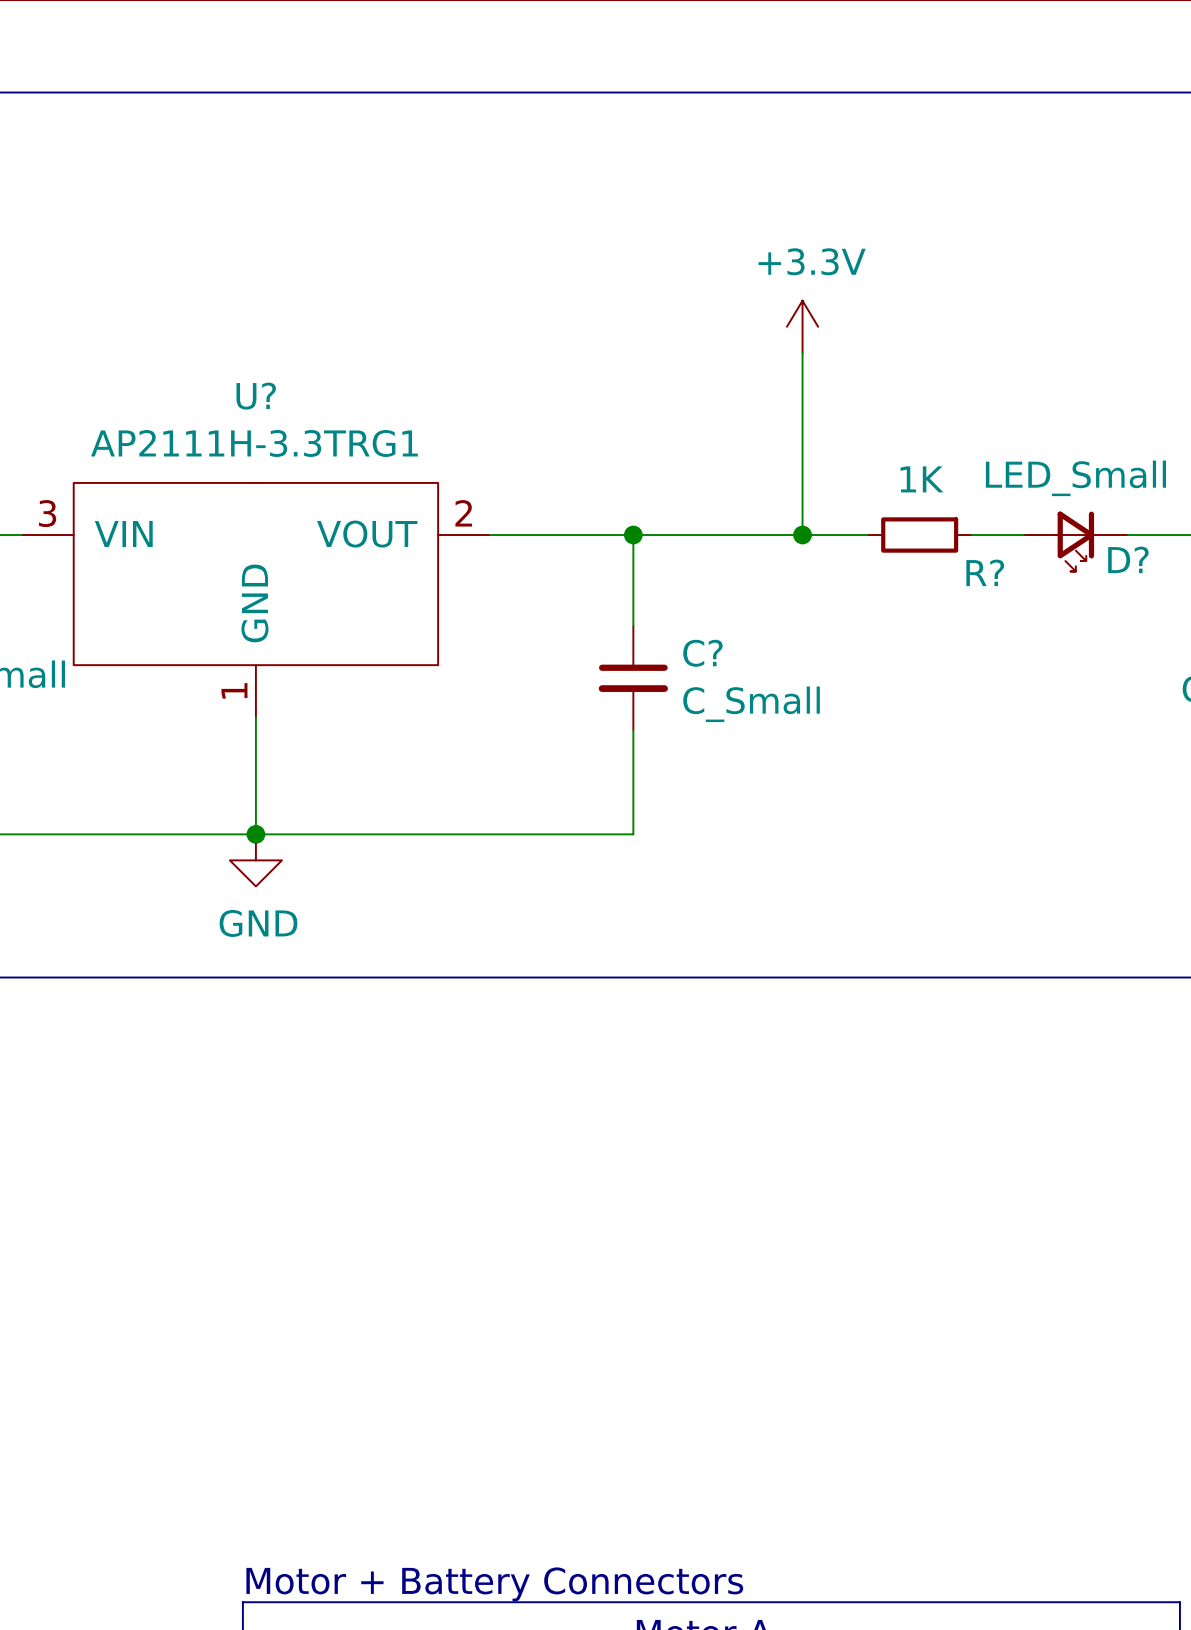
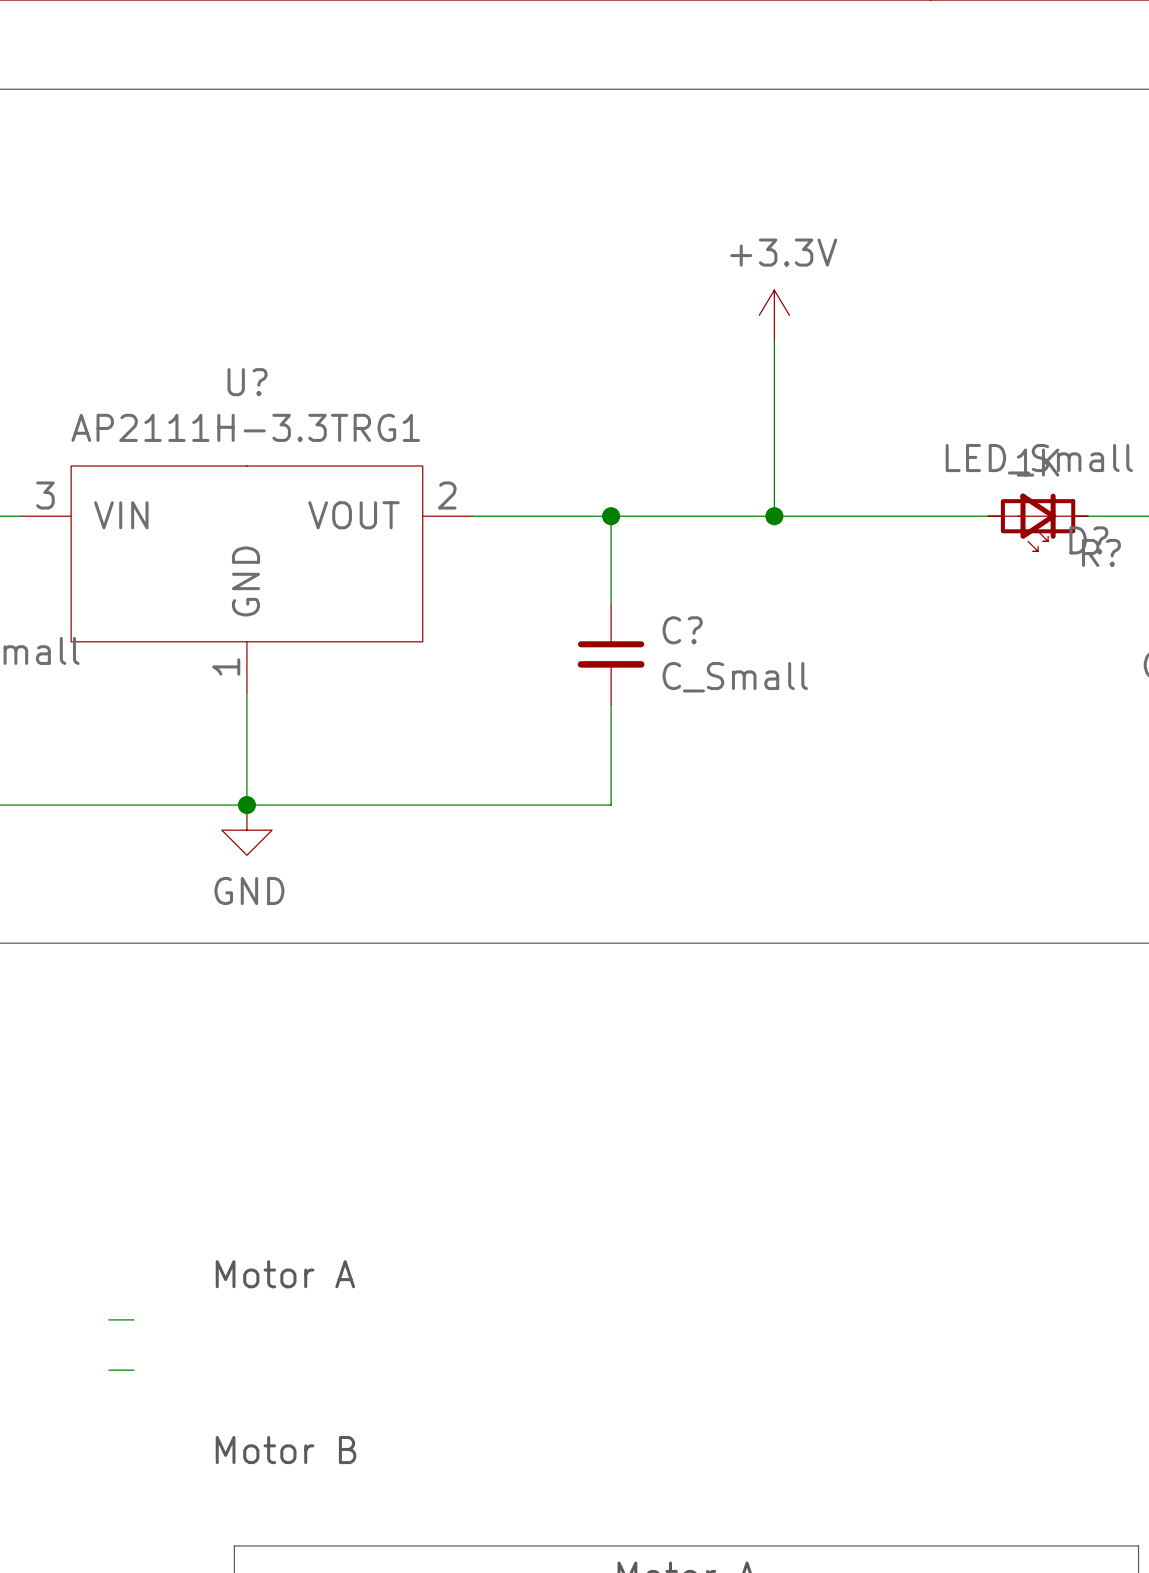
wire: none -> (837, 516) (937, 516)
R? position: (919, 535) -> (1038, 516)
text: none -> Motor A (285, 1274)
wire: none -> (108, 1319) (133, 1319)
wire: none -> (108, 1370) (133, 1370)
text: none -> Motor B (285, 1450)
text: Motor + Battery Connectors (494, 1584) -> none

